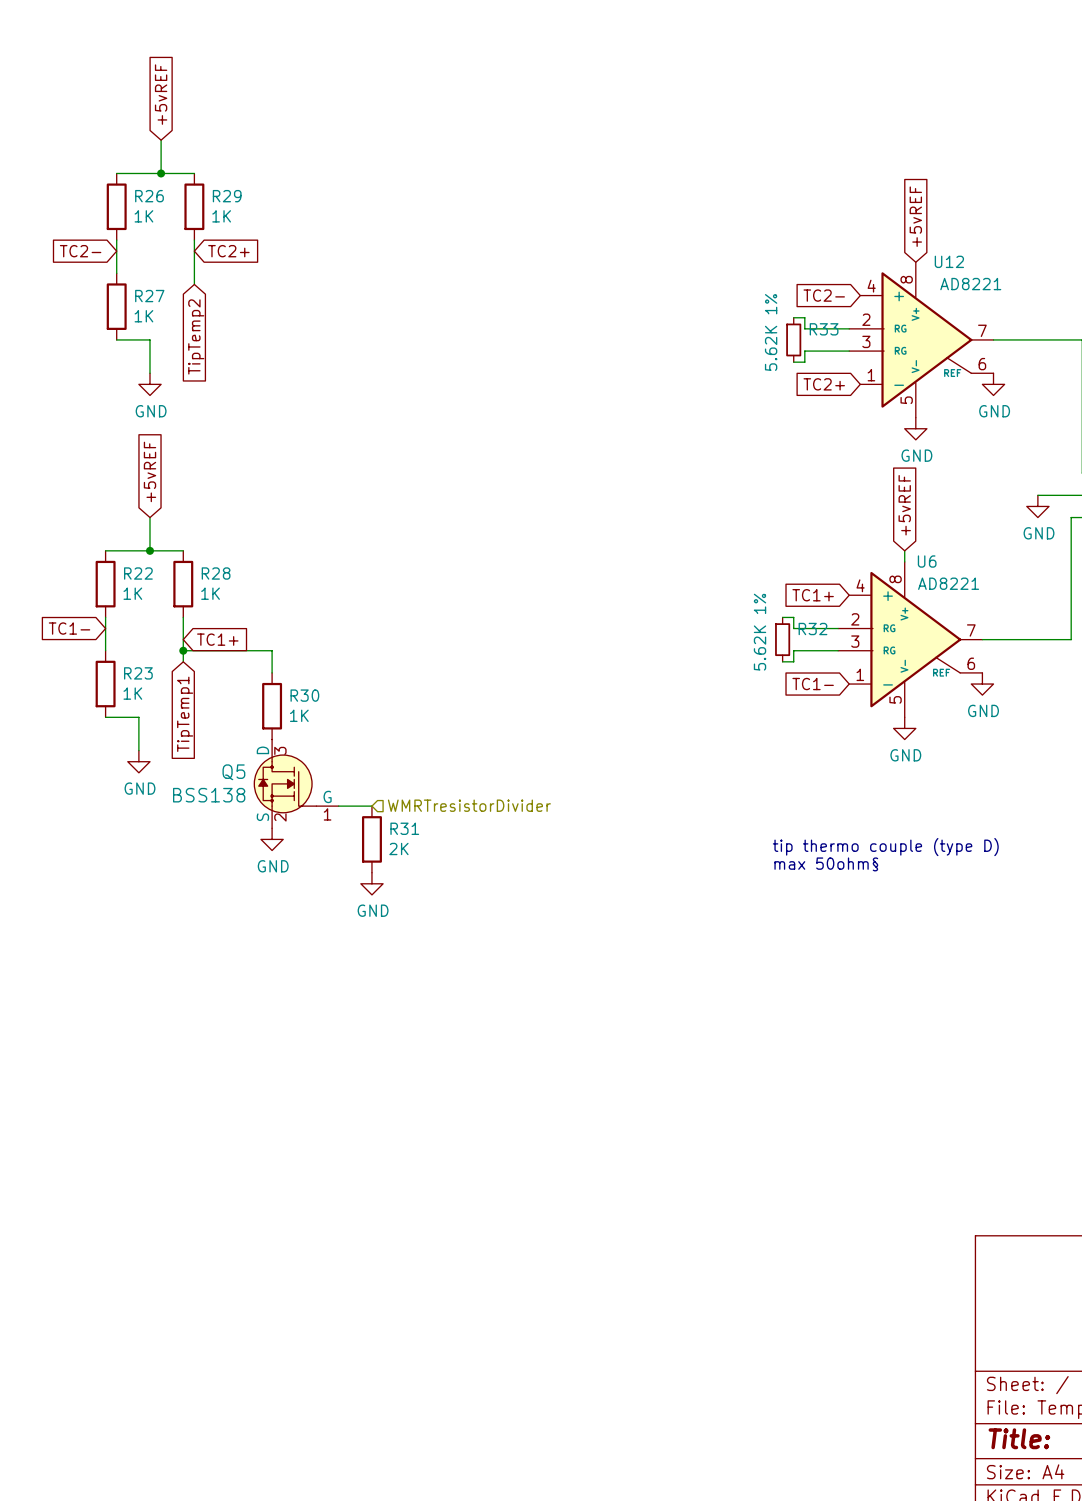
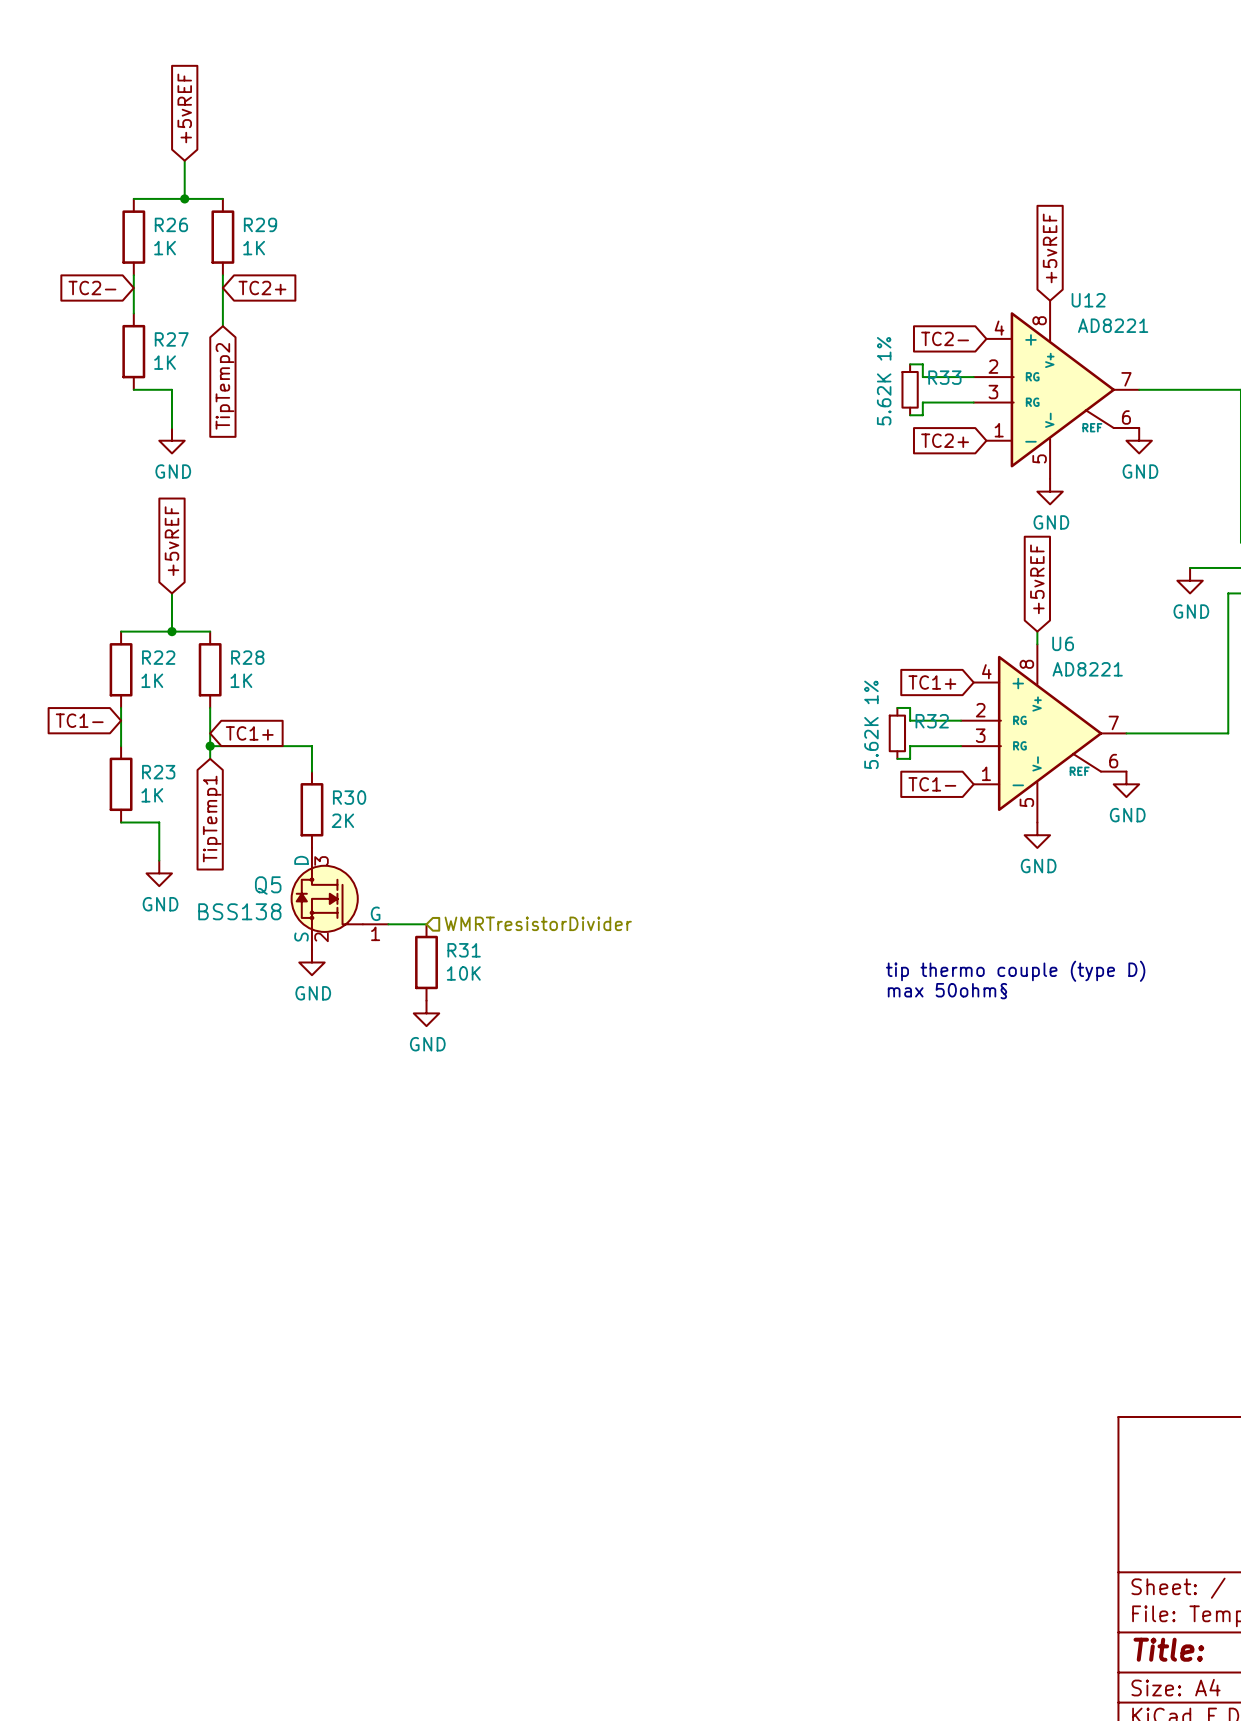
R30 value: 1K (299, 715) -> 2K (342, 820)
R31 value: 2K (398, 848) -> 10K (463, 973)

